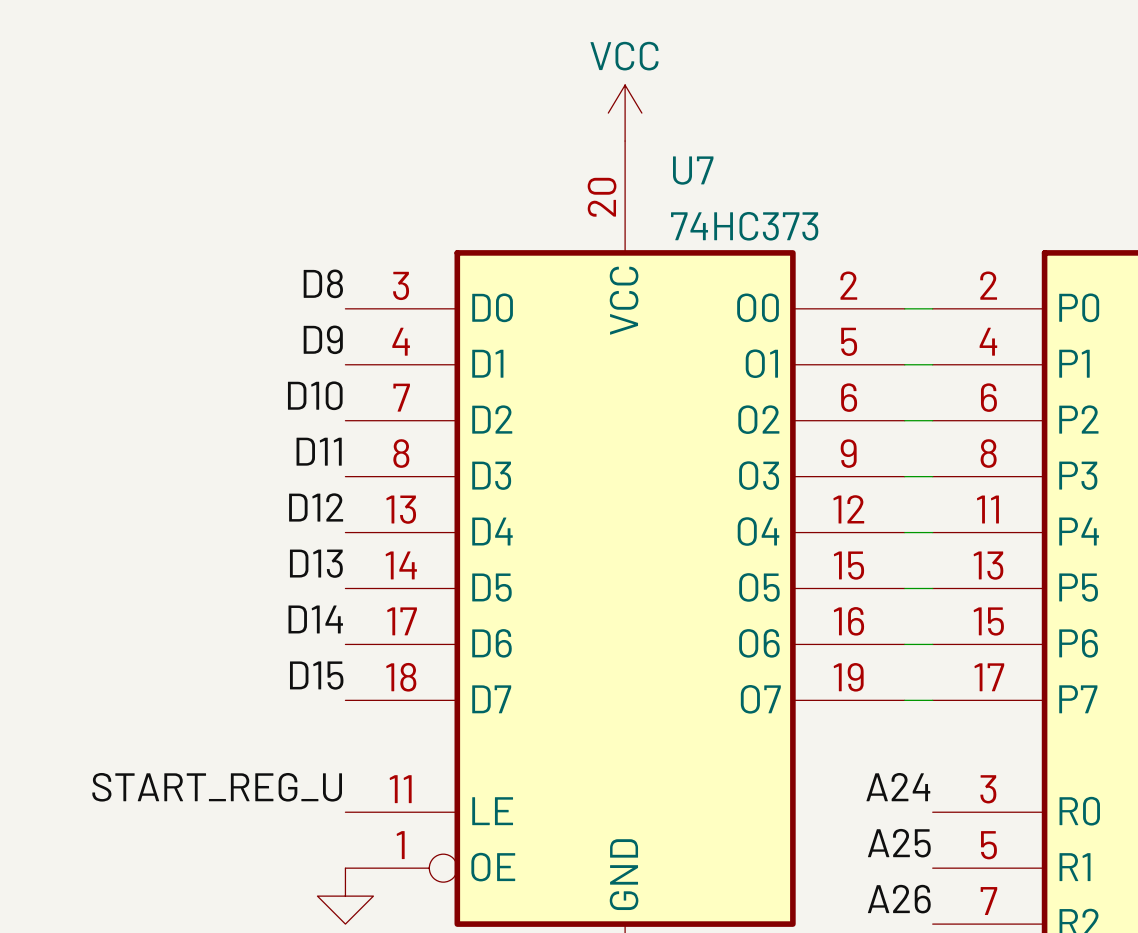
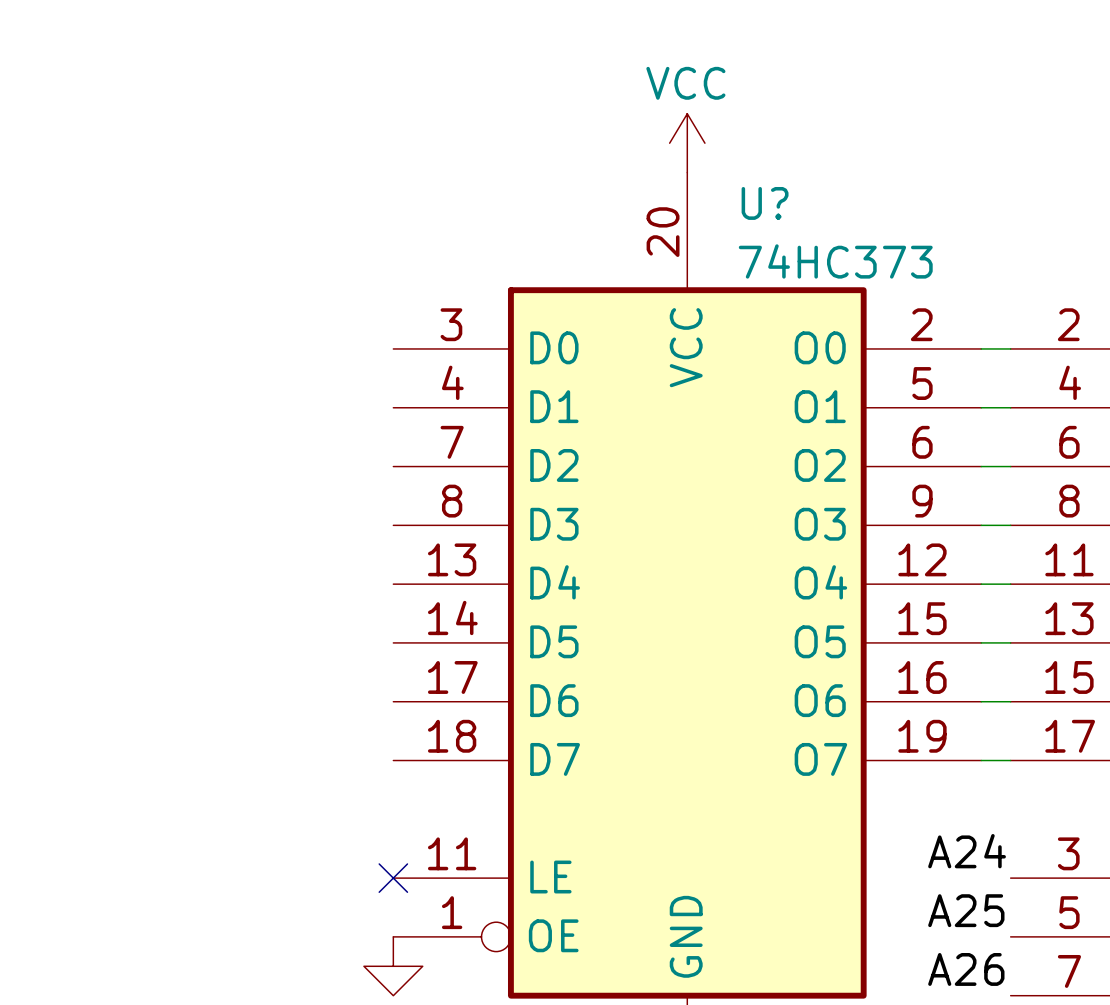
U7 name: U7 (693, 170) -> U? (765, 203)
label: D8 (323, 283) -> none
label: D9 (323, 339) -> none
label: D10 (315, 395) -> none
label: D11 (319, 451) -> none
label: D12 (316, 507) -> none
label: D13 (316, 563) -> none
label: D14 (315, 619) -> none
label: D15 (316, 675) -> none
label: START_REG_U (217, 787) -> none
no-connect mark: none -> (393, 878)

